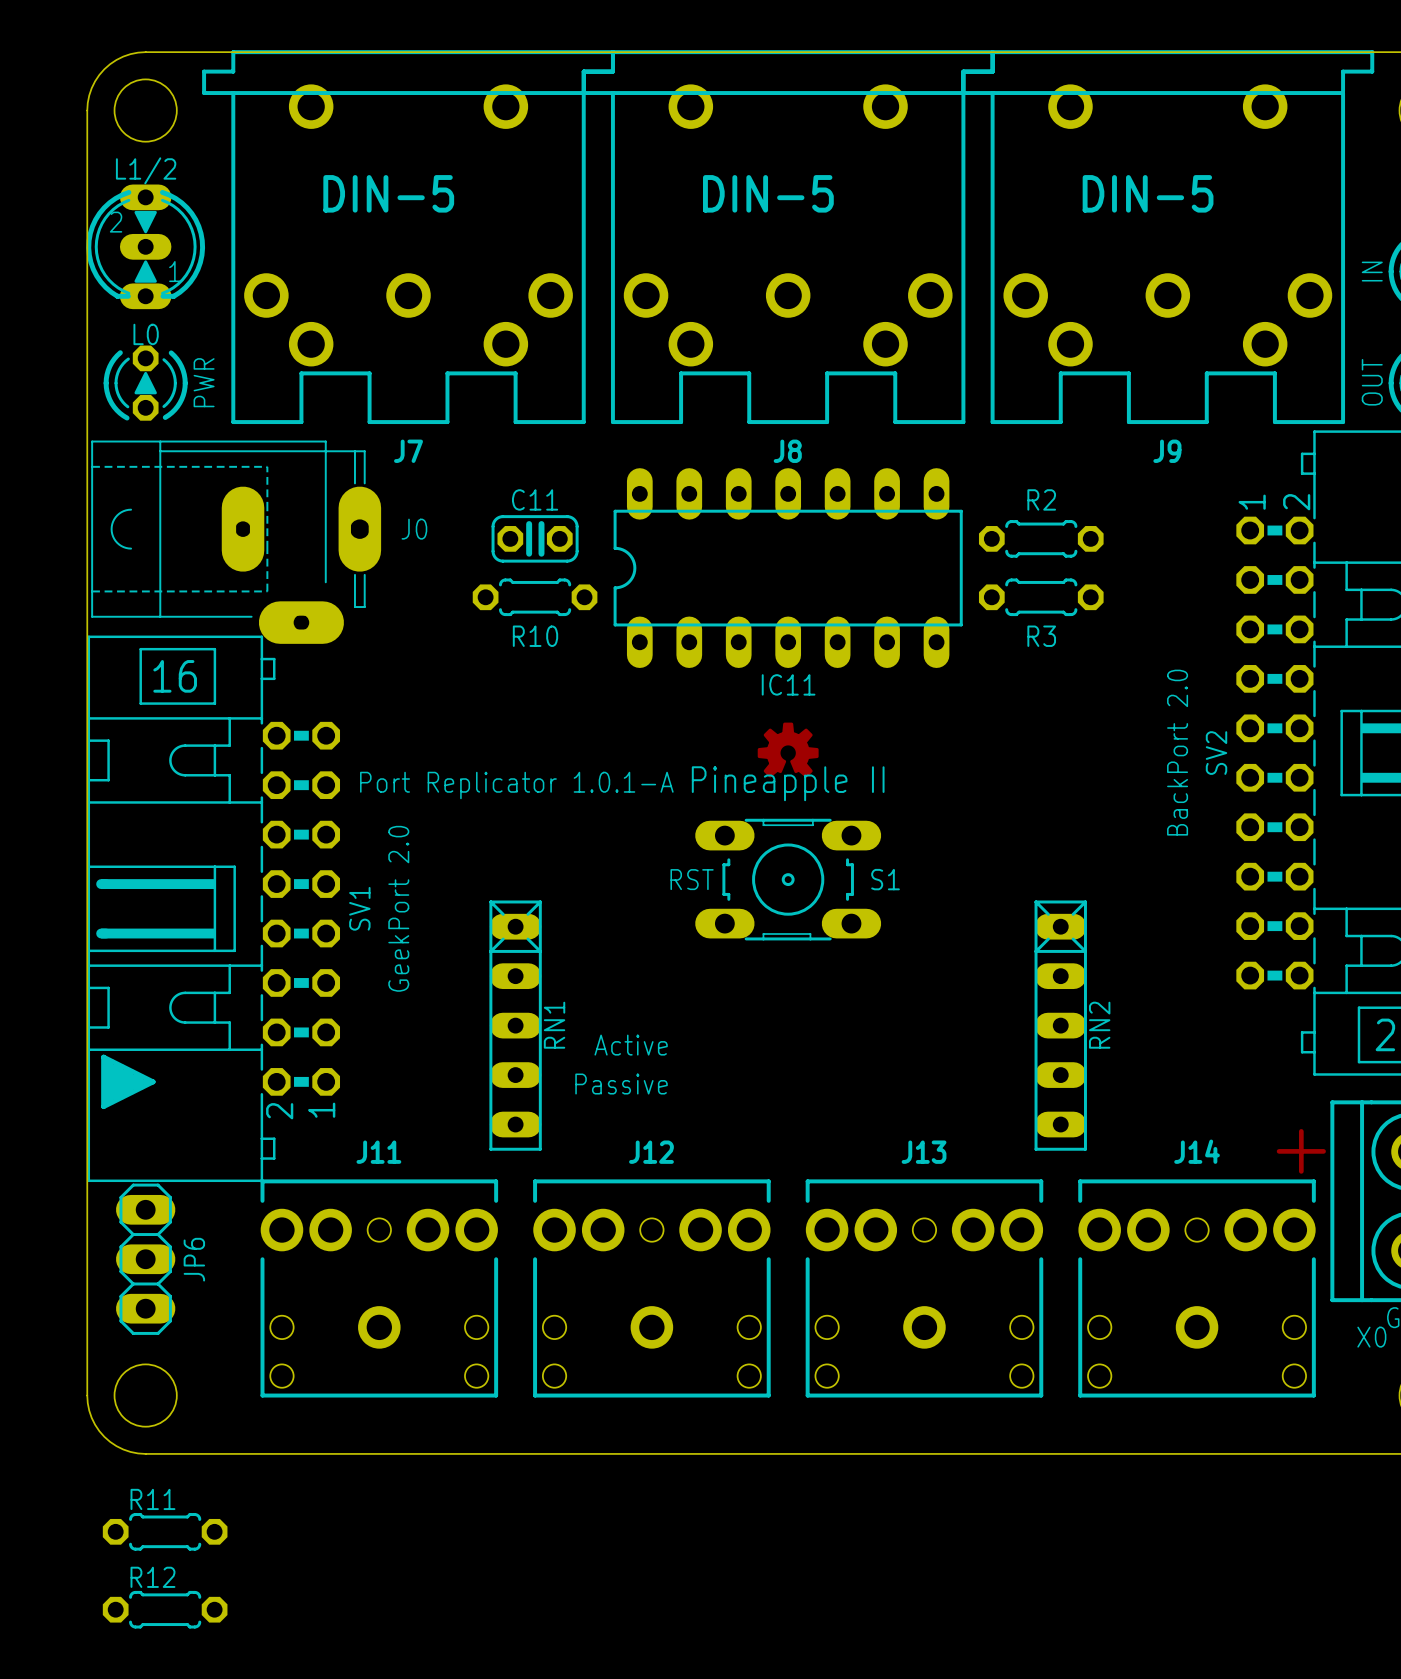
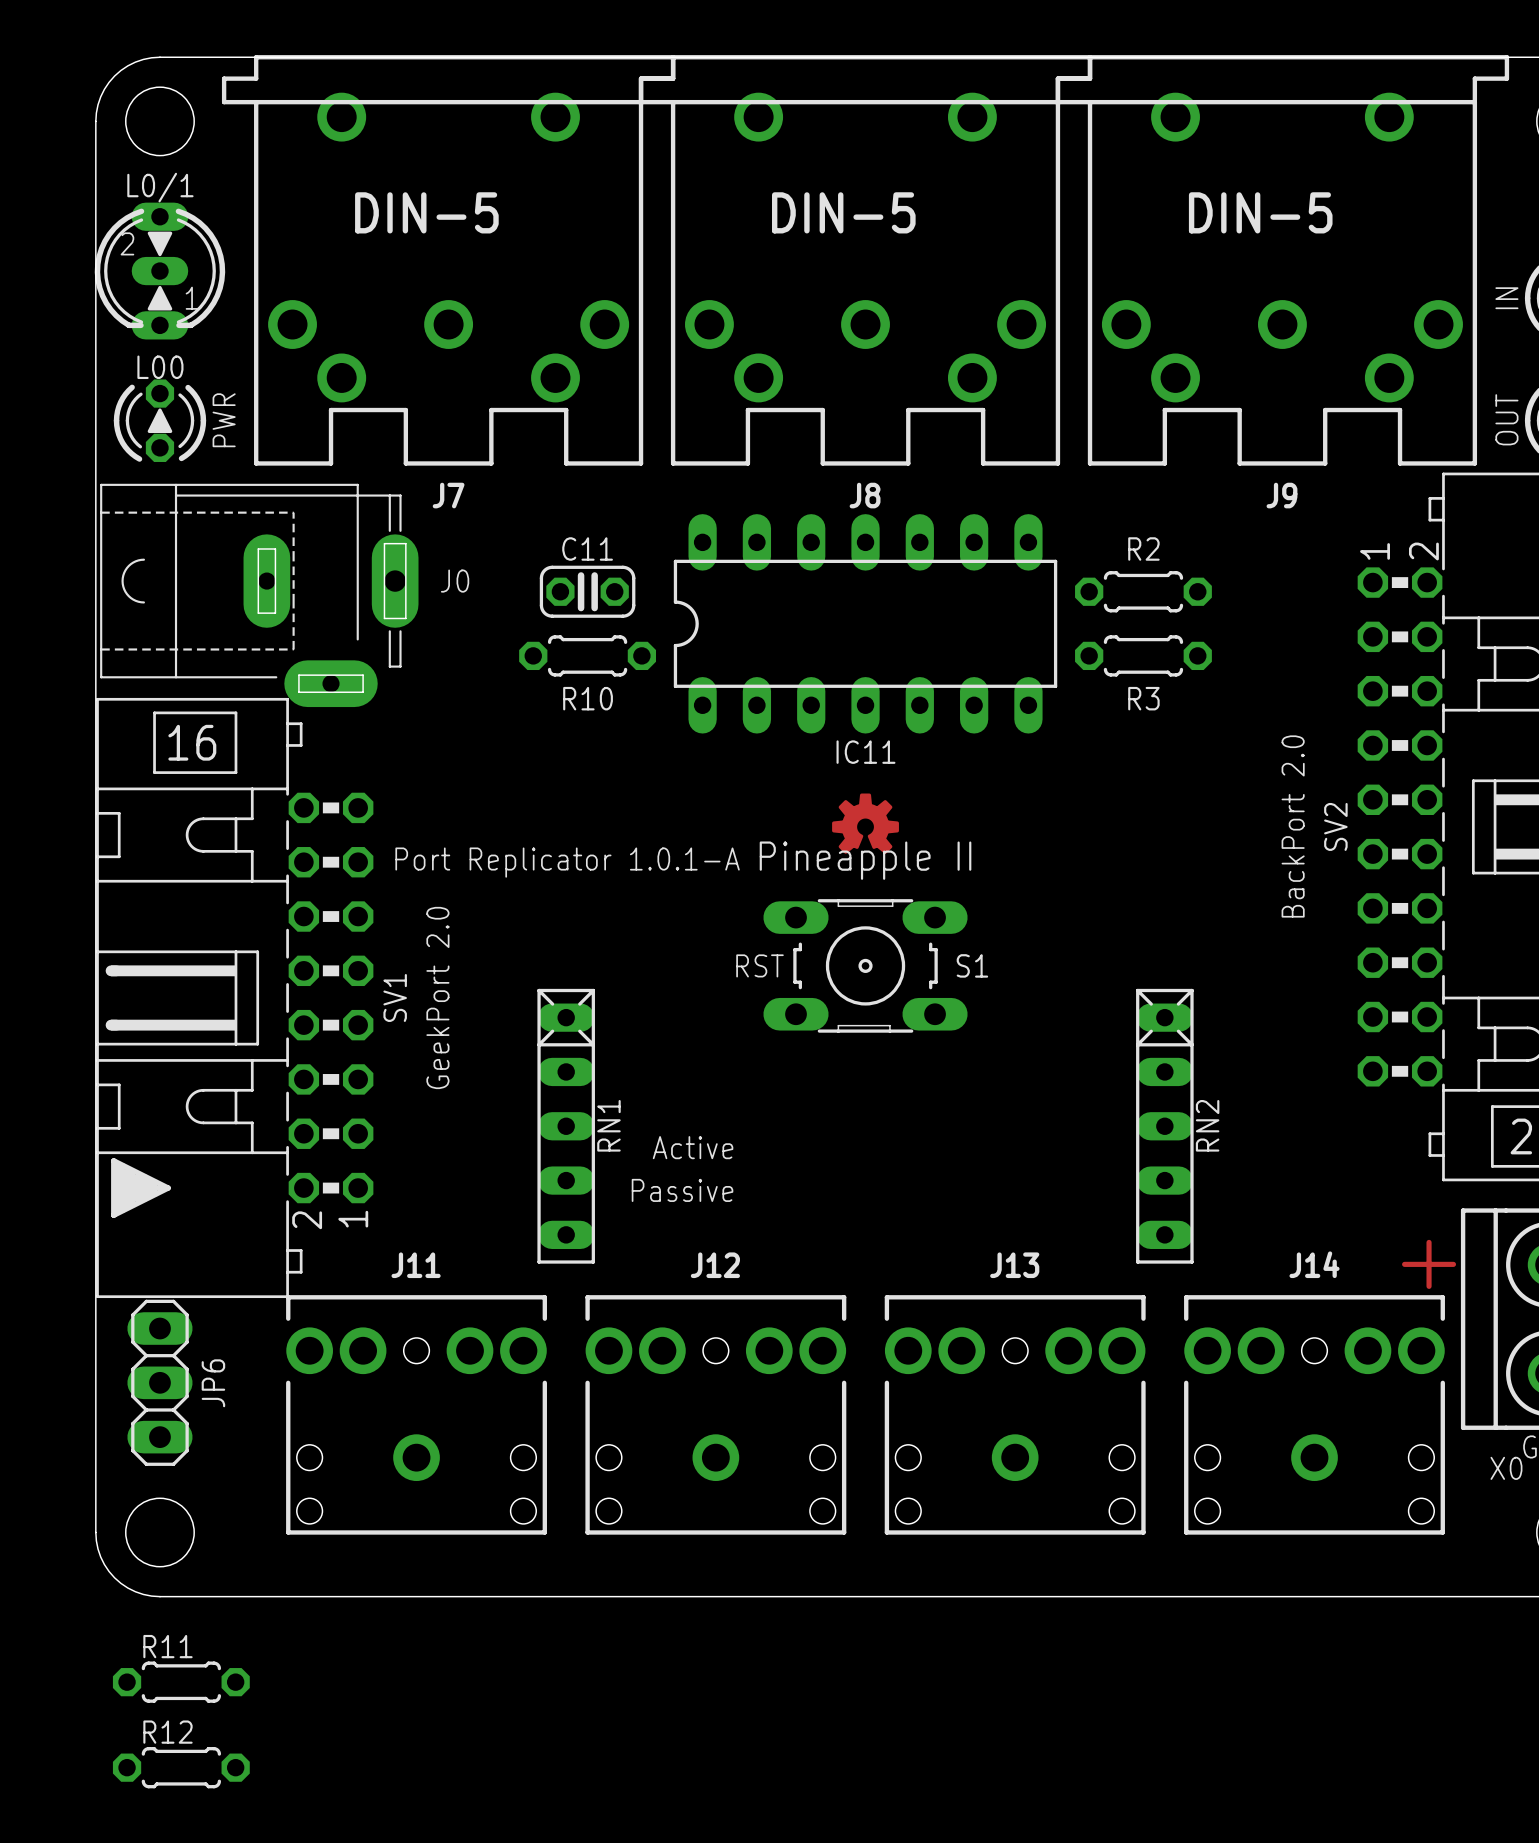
L1/2 name: L1/2 (146, 170) -> L0/1 (160, 187)
L0 name: L0 (146, 334) -> L00 (160, 367)

